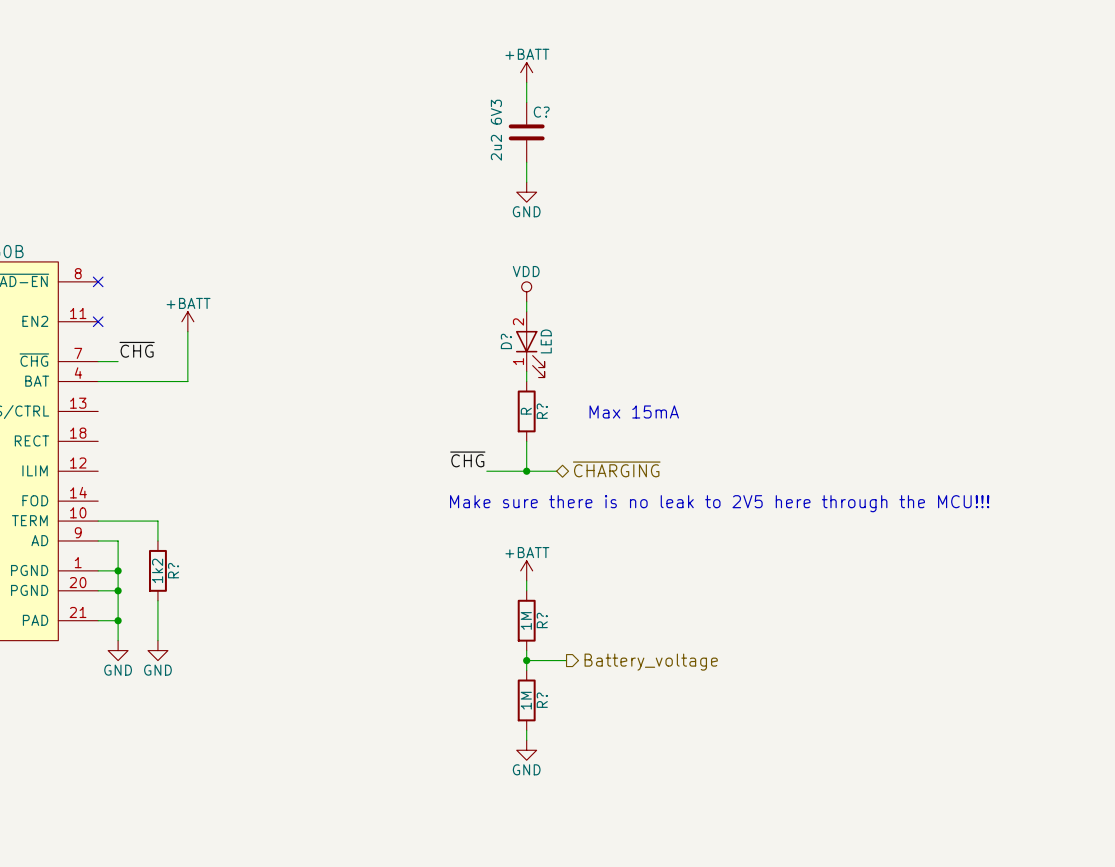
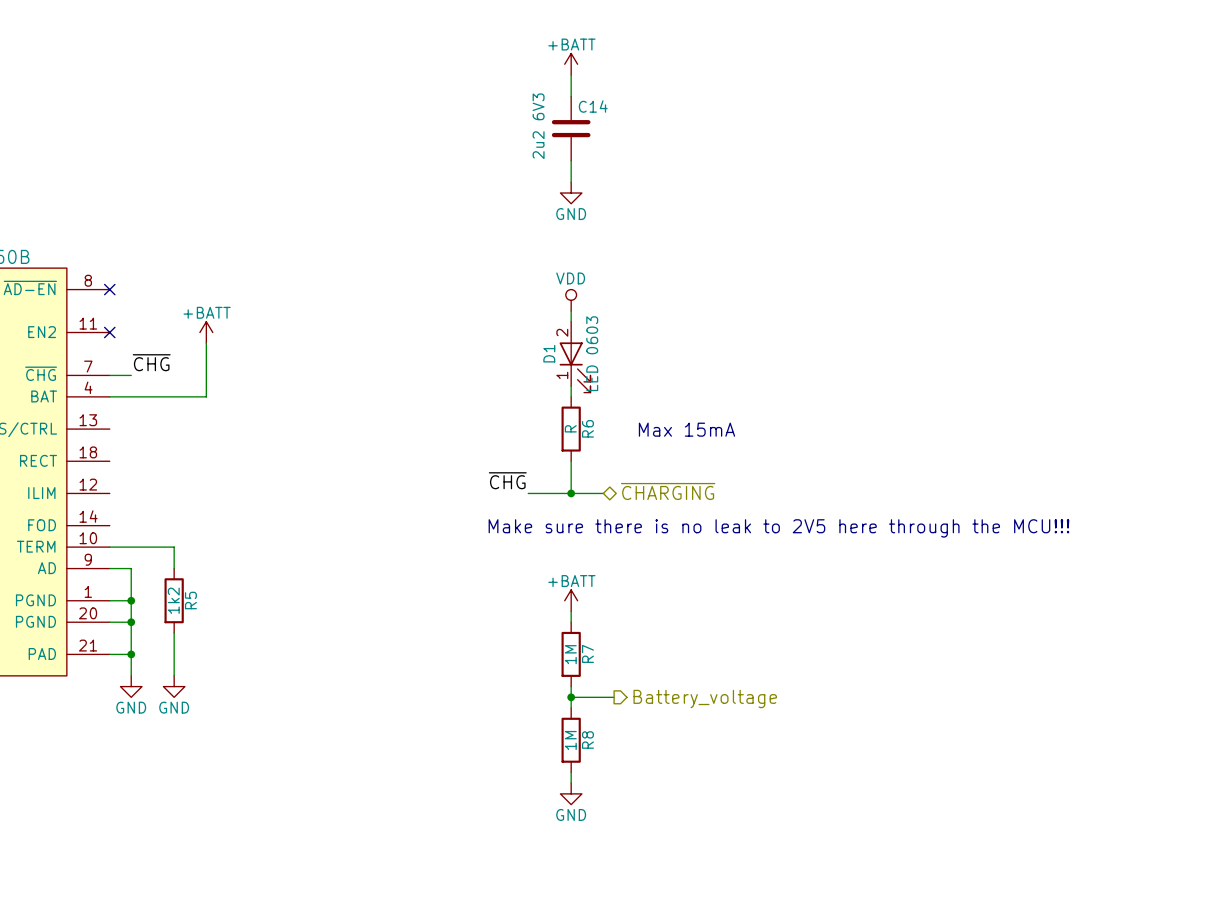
C? name: C? (541, 112) -> C14 (593, 106)
D? name: D? (506, 341) -> D1 (549, 353)
D? value: LED (546, 341) -> LED 0603 (592, 353)
R? name: R? (542, 411) -> R6 (587, 428)
R? name: R? (173, 570) -> R5 (190, 600)
R? name: R? (542, 620) -> R7 (587, 653)
R? name: R? (542, 700) -> R8 (587, 739)

